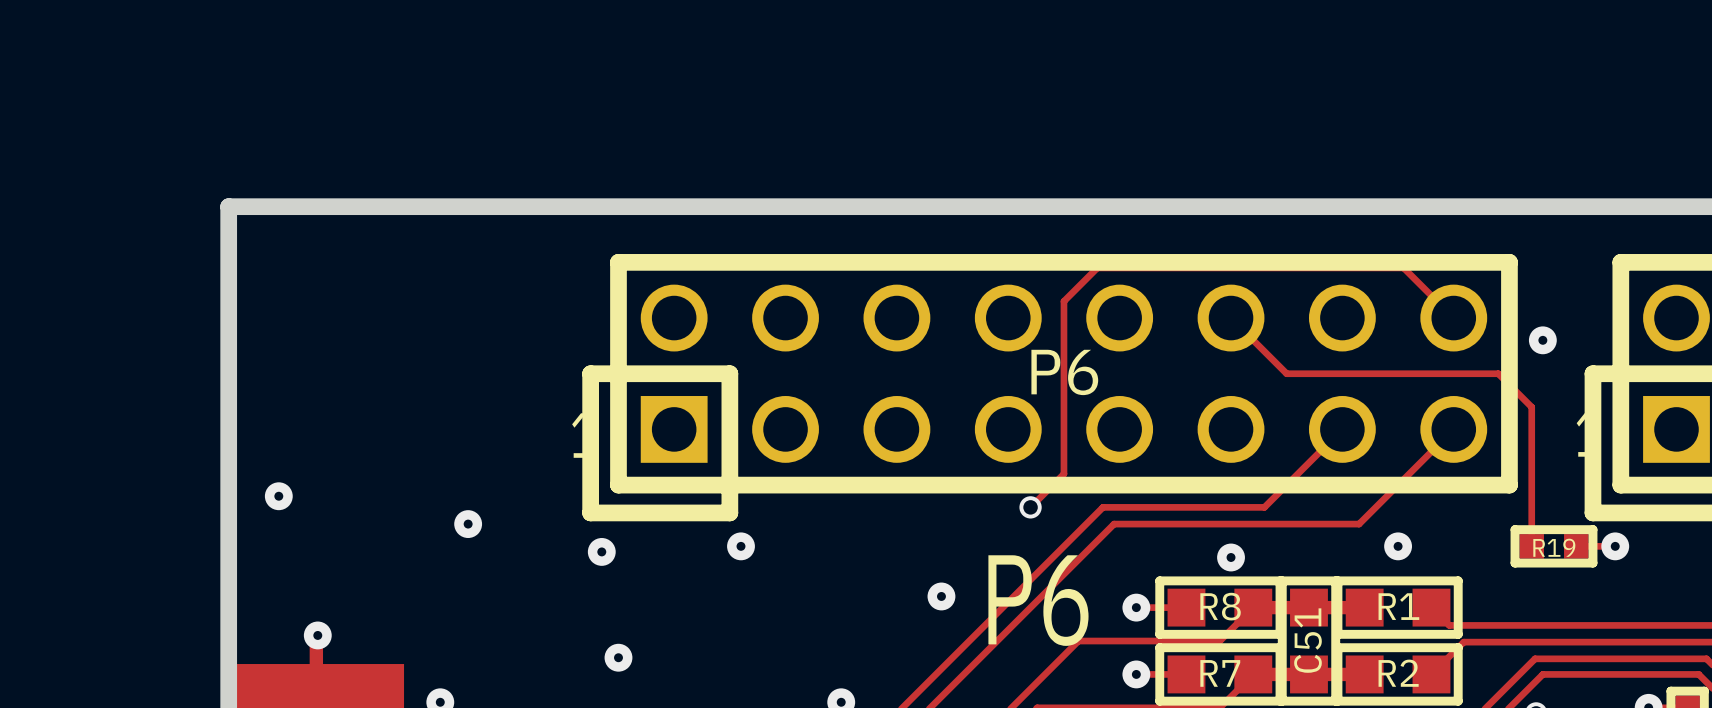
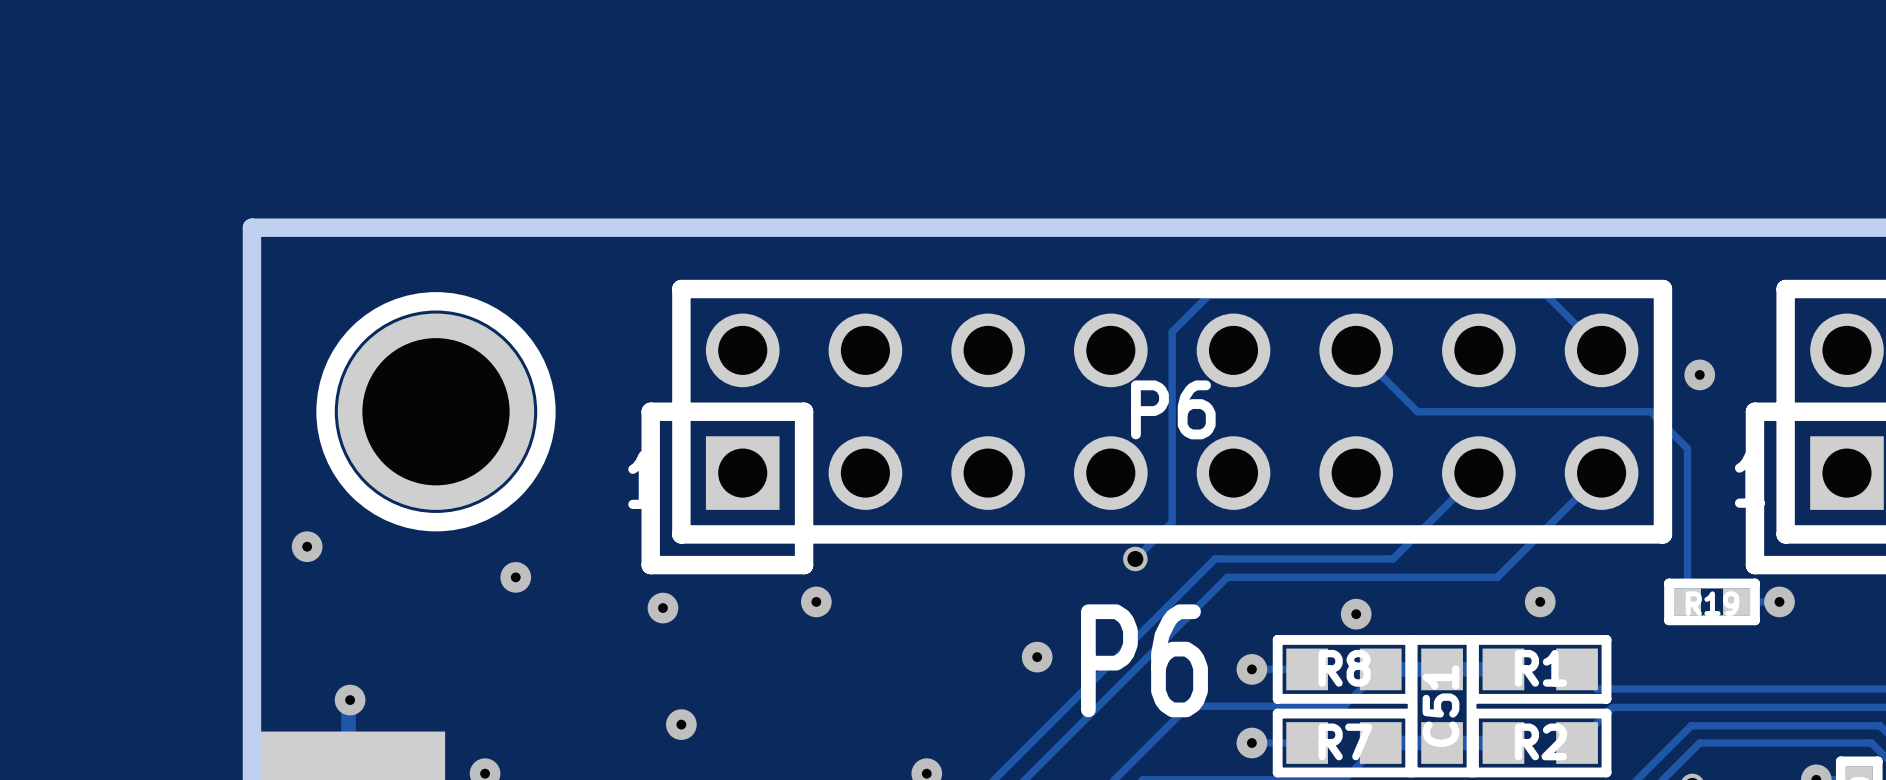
part: none -> (435, 411)

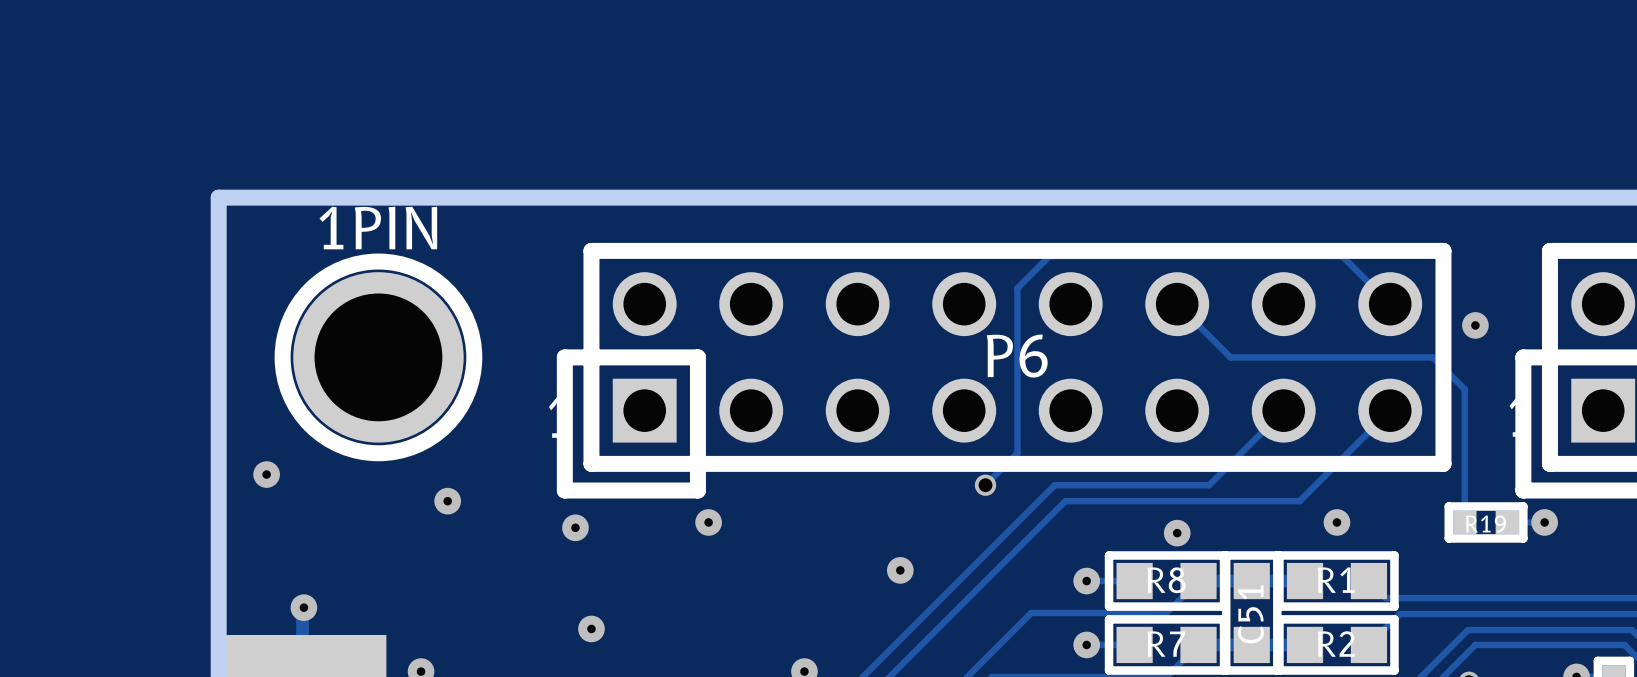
1PIN name: none -> 1PIN (378, 228)
text: P6 (1144, 660) -> none

